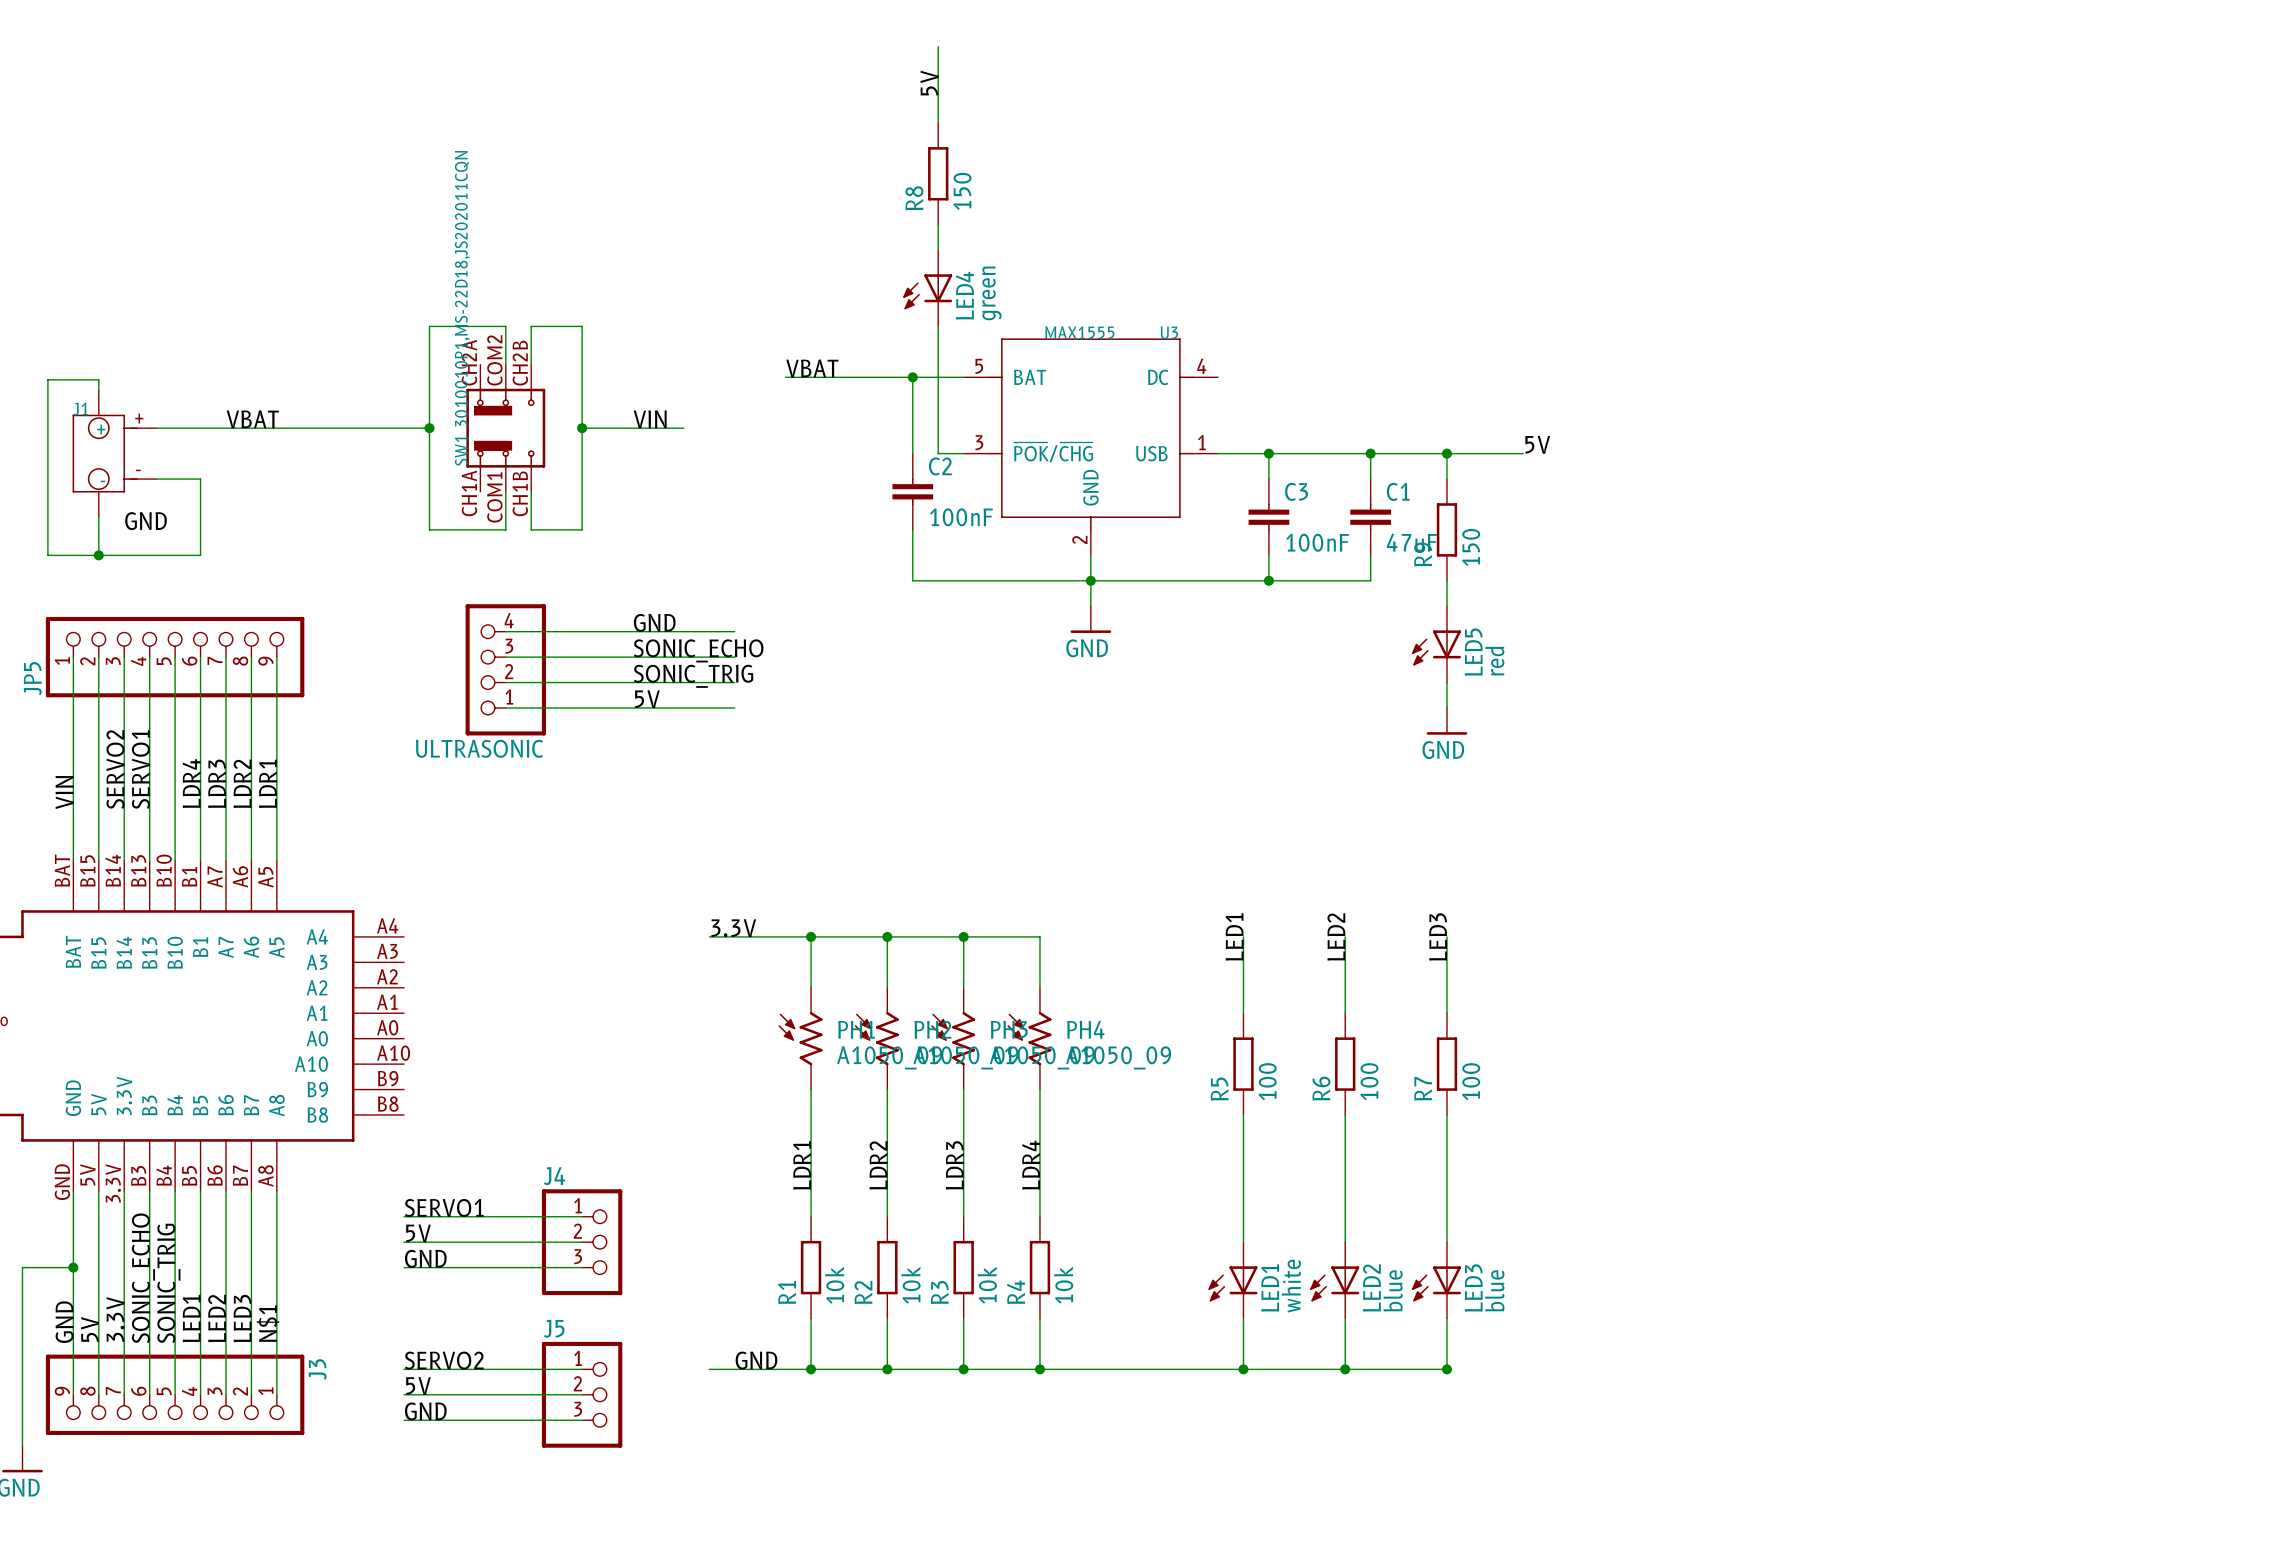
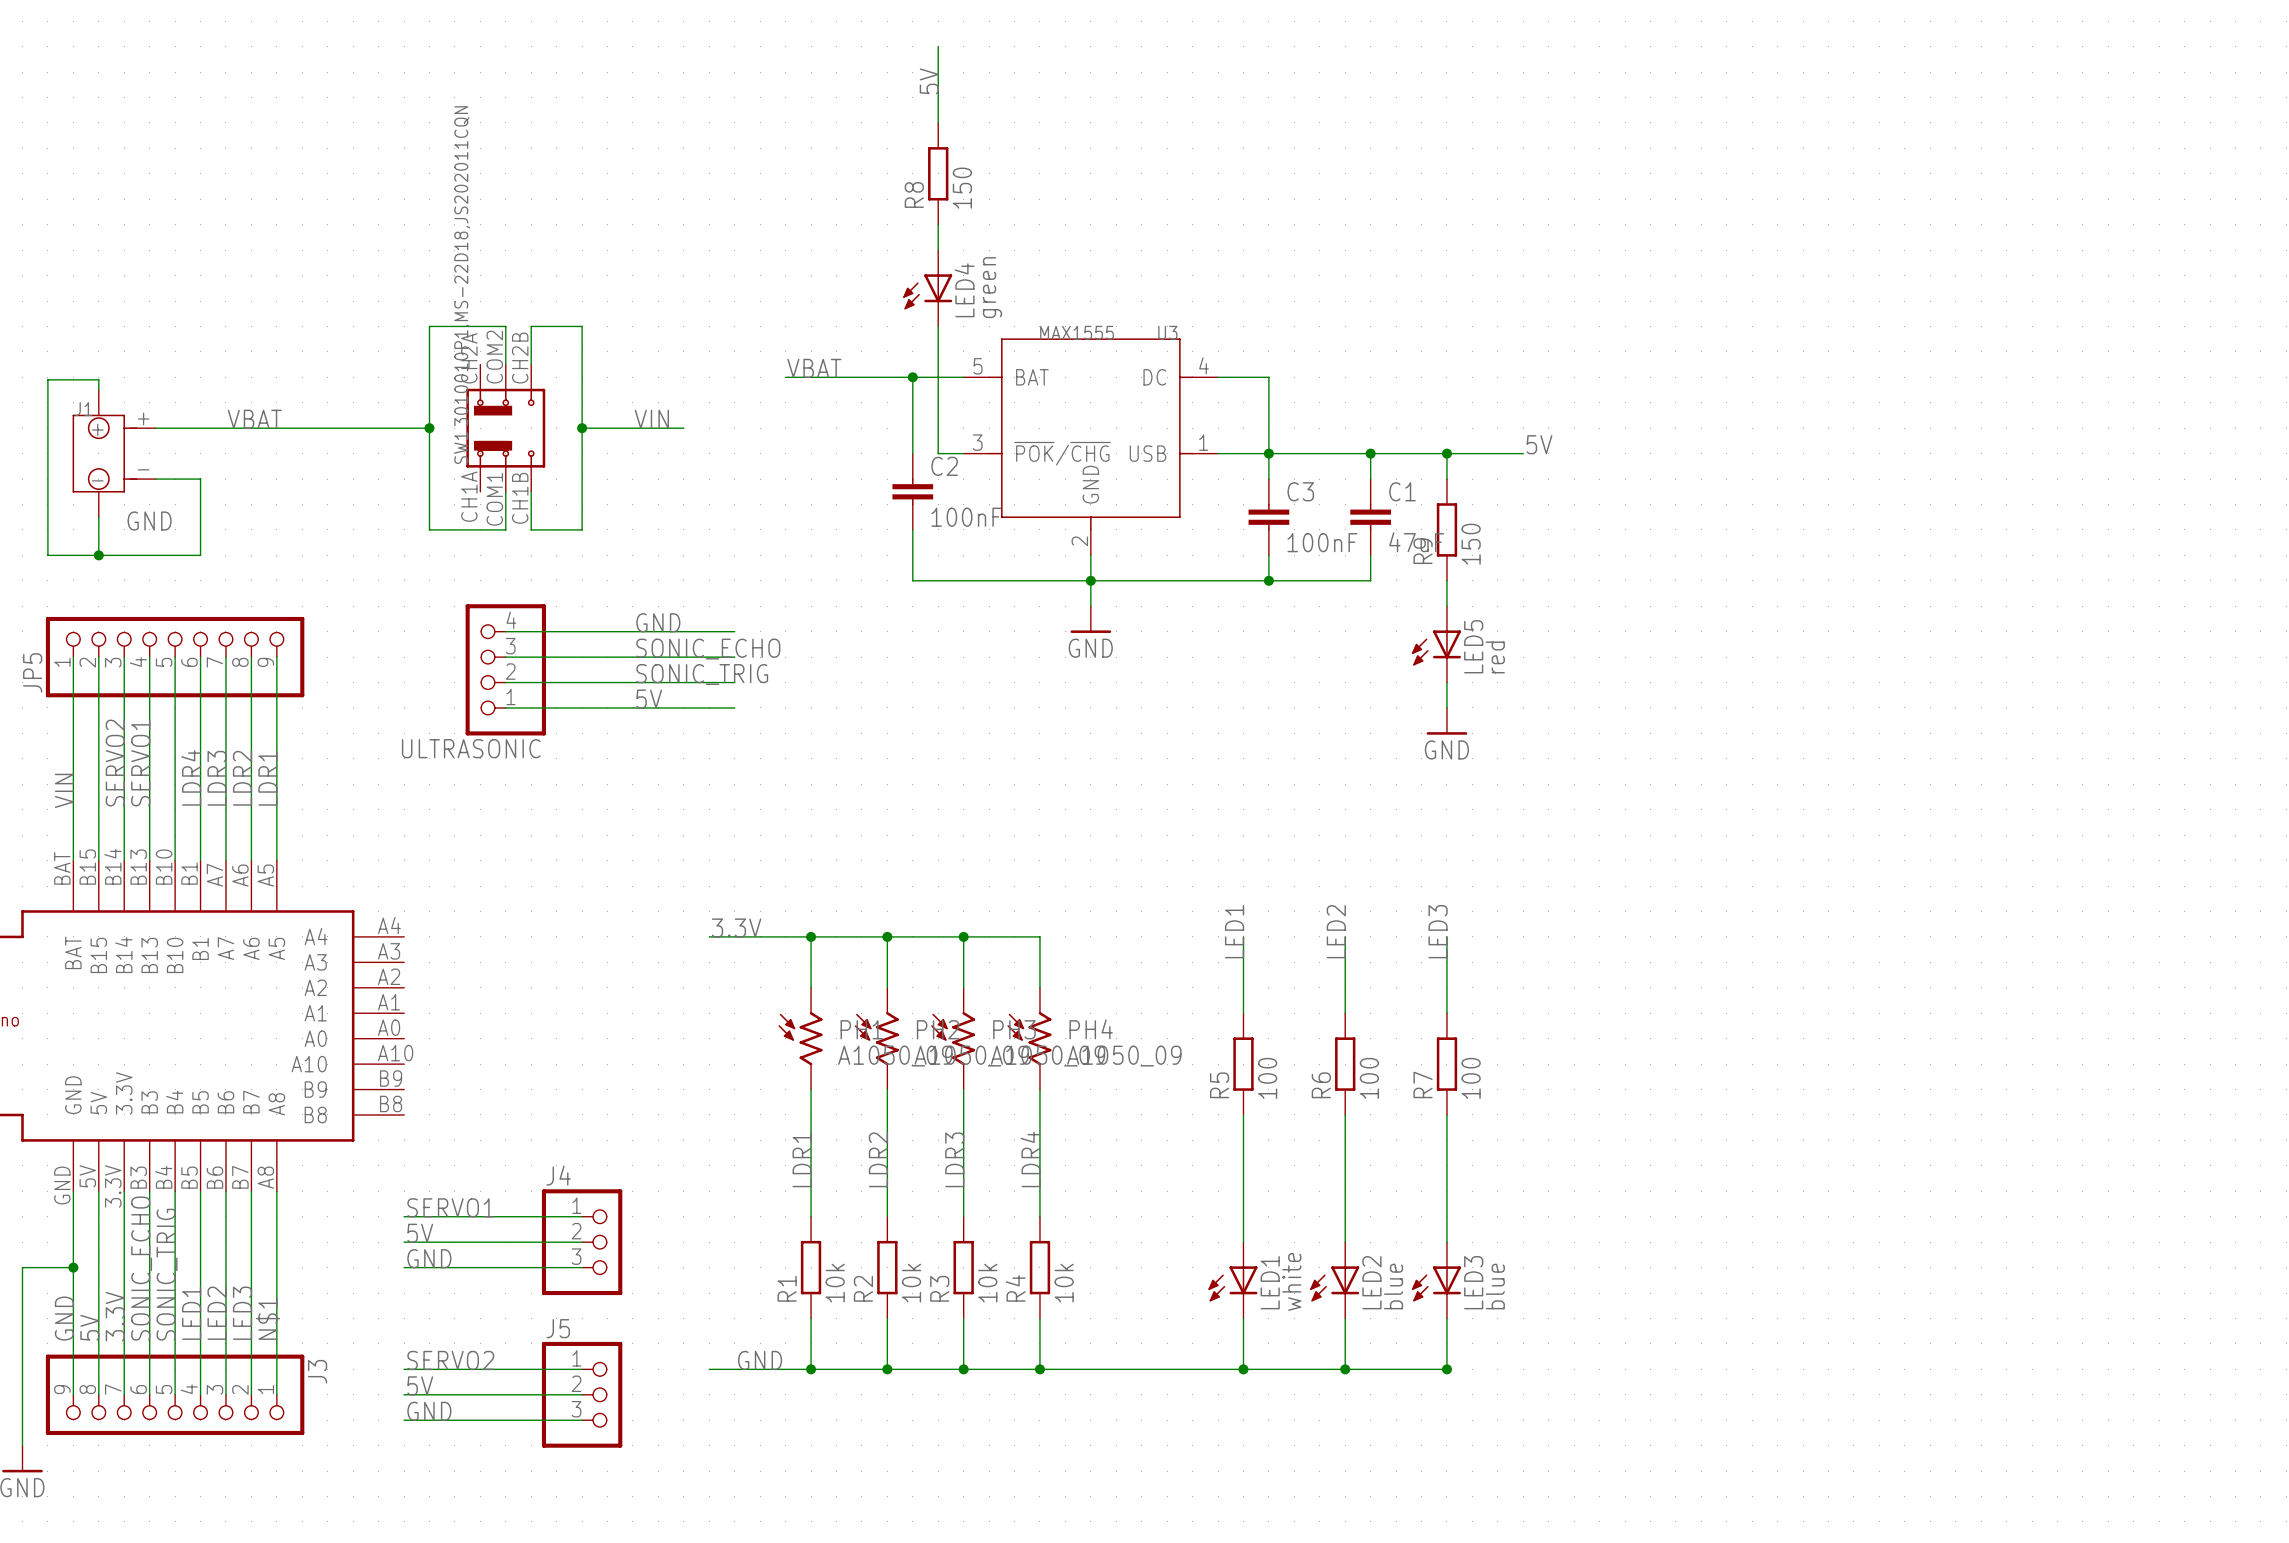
wire: none -> (1218, 377) (1268, 377) (1268, 453)

